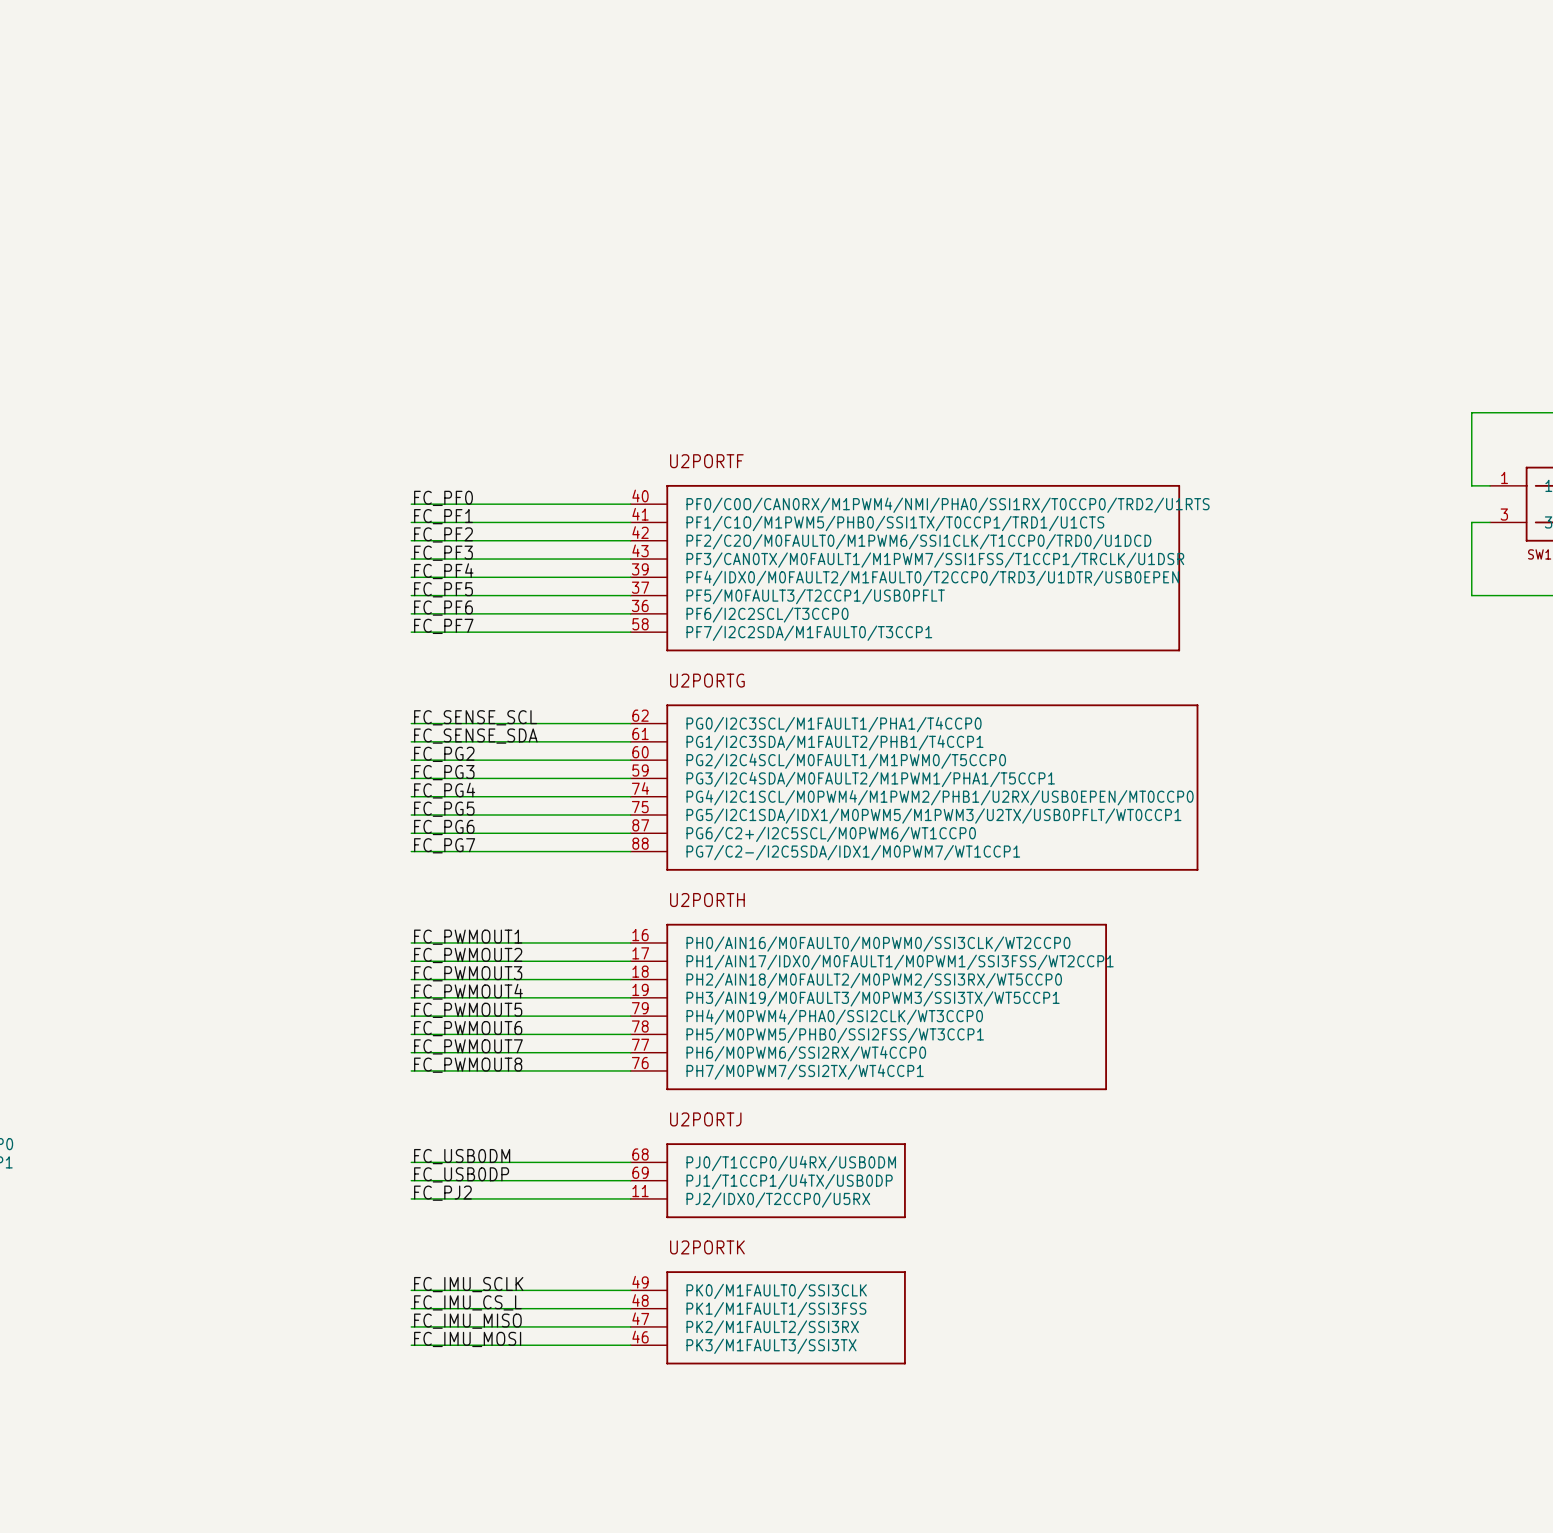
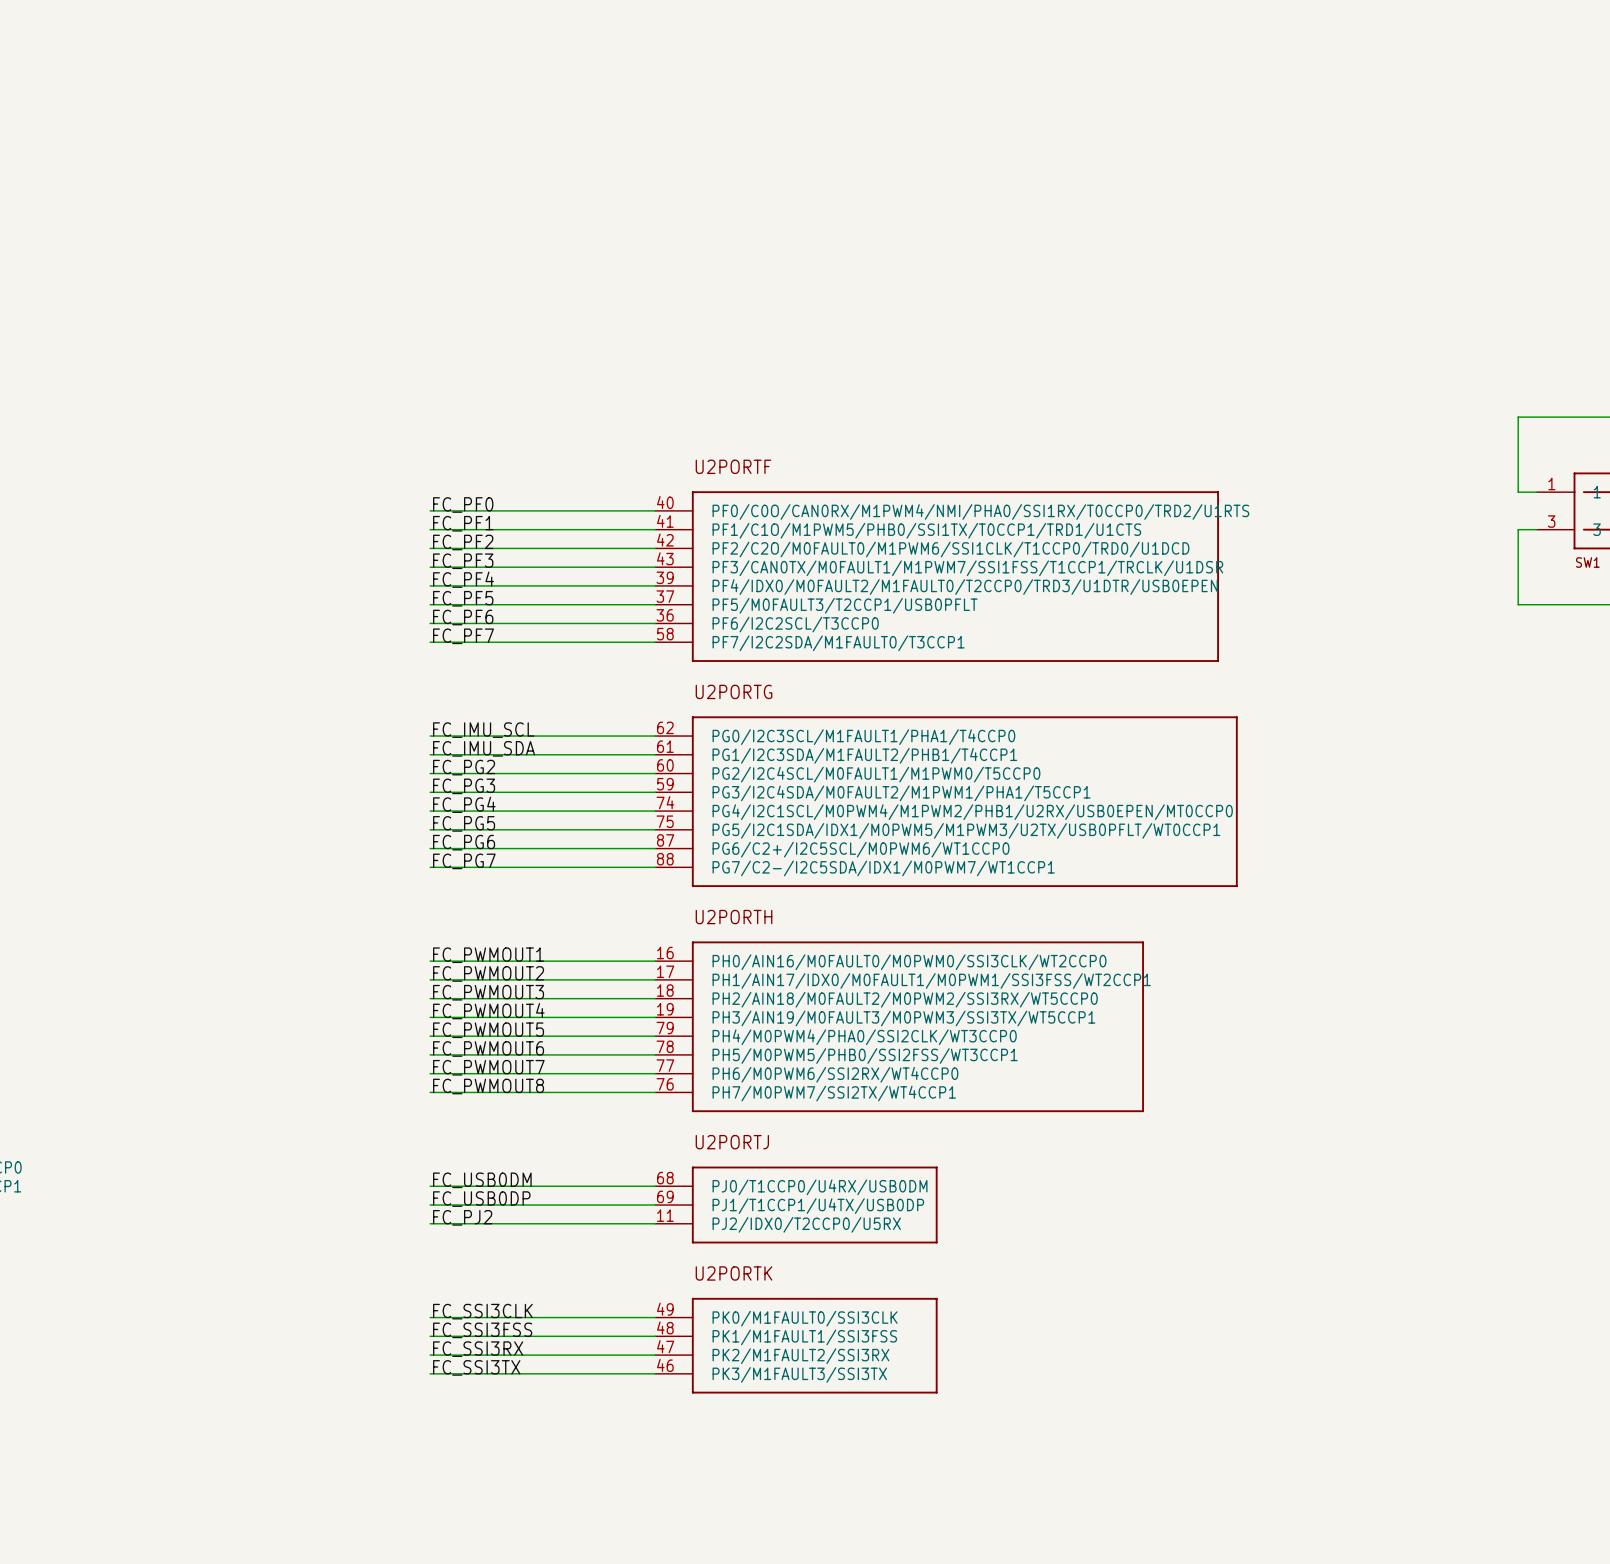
label: FC_SENSE_SCL (475, 717) -> FC_IMU_SCL (483, 730)
label: FC_SENSE_SDA (475, 736) -> FC_IMU_SDA (484, 748)
label: FC_IMU_SCLK (468, 1284) -> FC_SSI3CLK (482, 1311)
label: FC_IMU_CS_L (467, 1302) -> FC_SSI3FSS (482, 1330)
label: FC_IMU_MISO (467, 1321) -> FC_SSI3RX (478, 1349)
label: FC_IMU_MOSI (467, 1339) -> FC_SSI3TX (476, 1367)

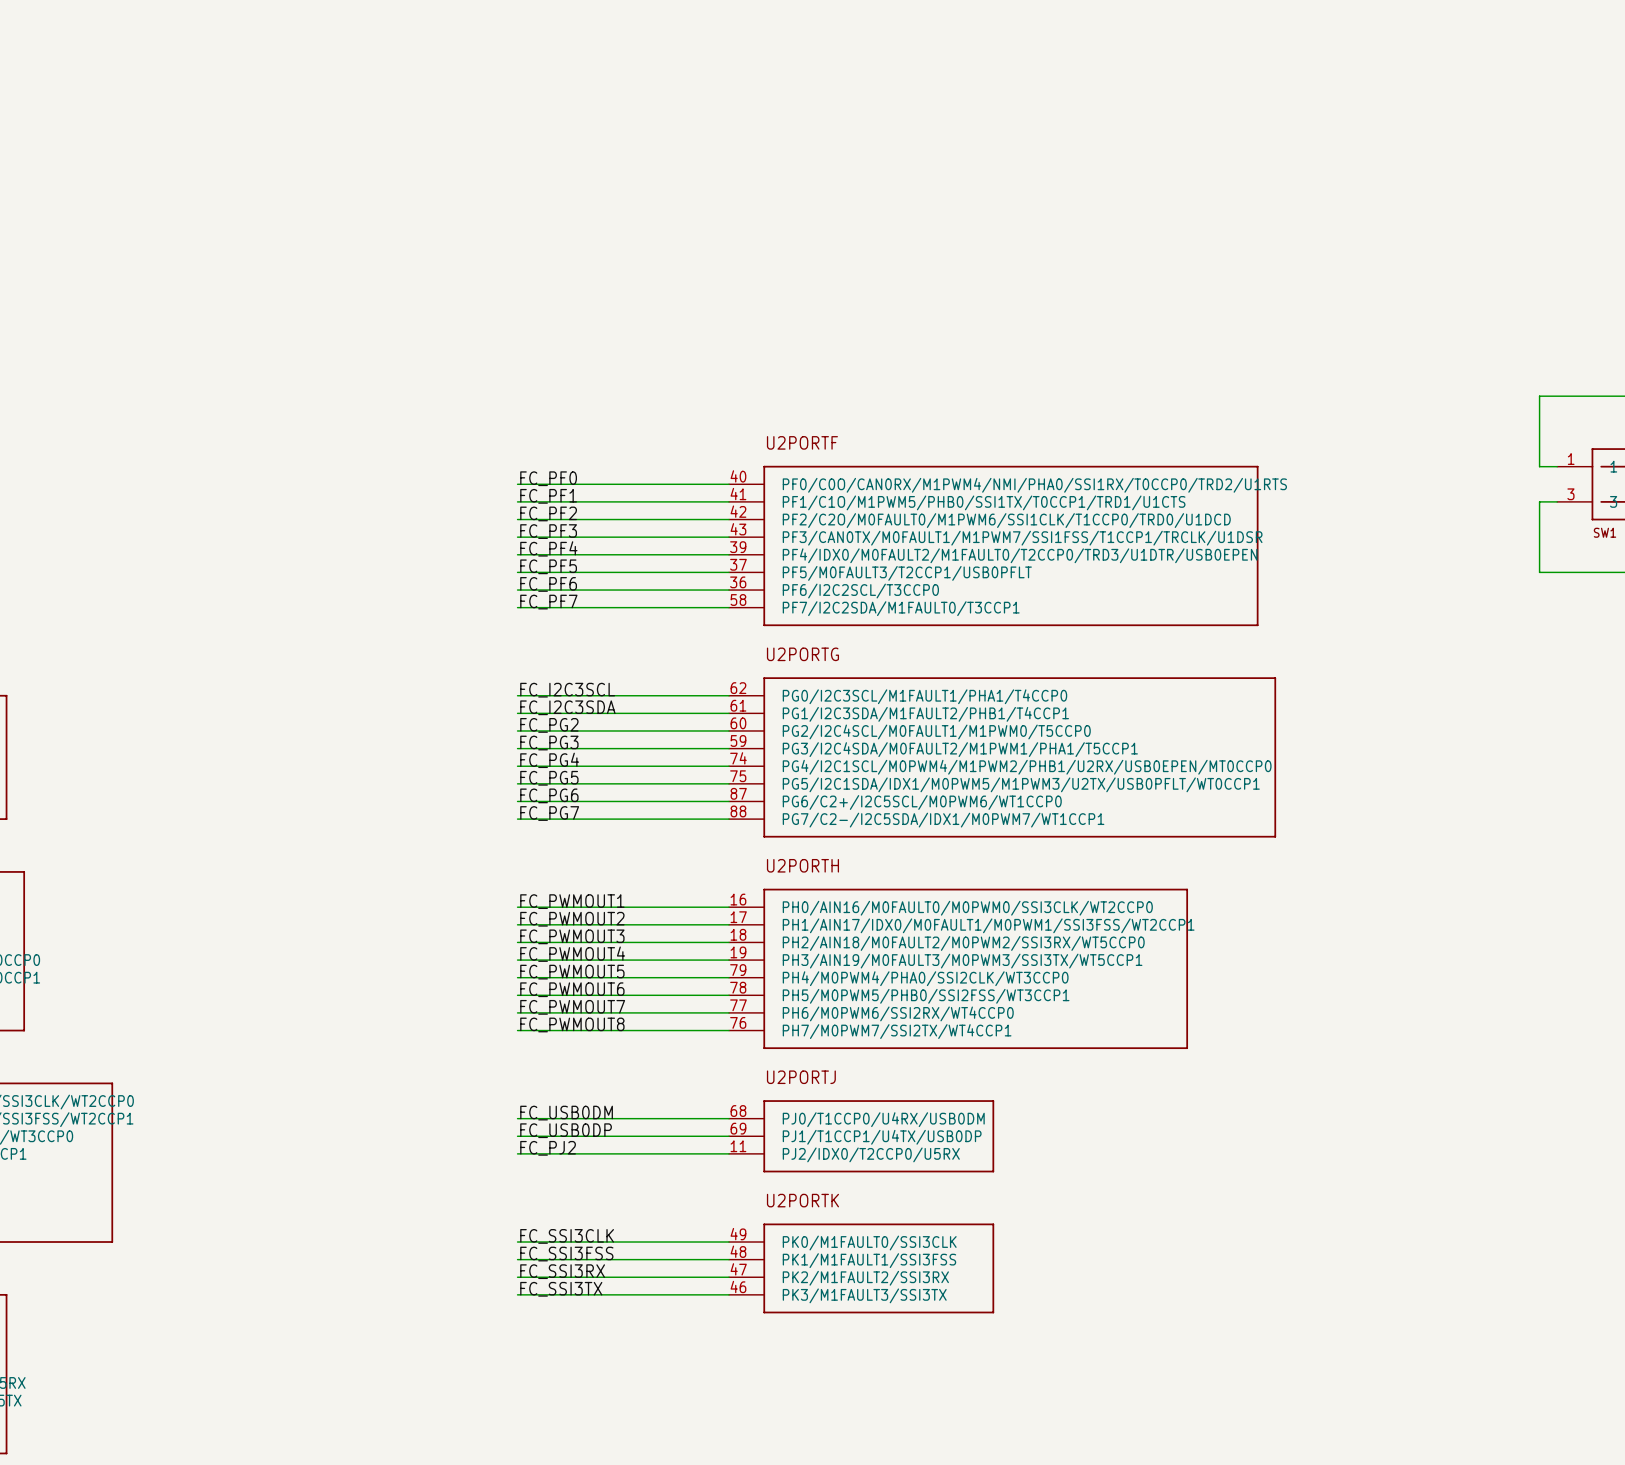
label: FC_IMU_SCL (483, 730) -> FC_I2C3SCL (567, 690)
label: FC_IMU_SDA (484, 748) -> FC_I2C3SDA (567, 707)

